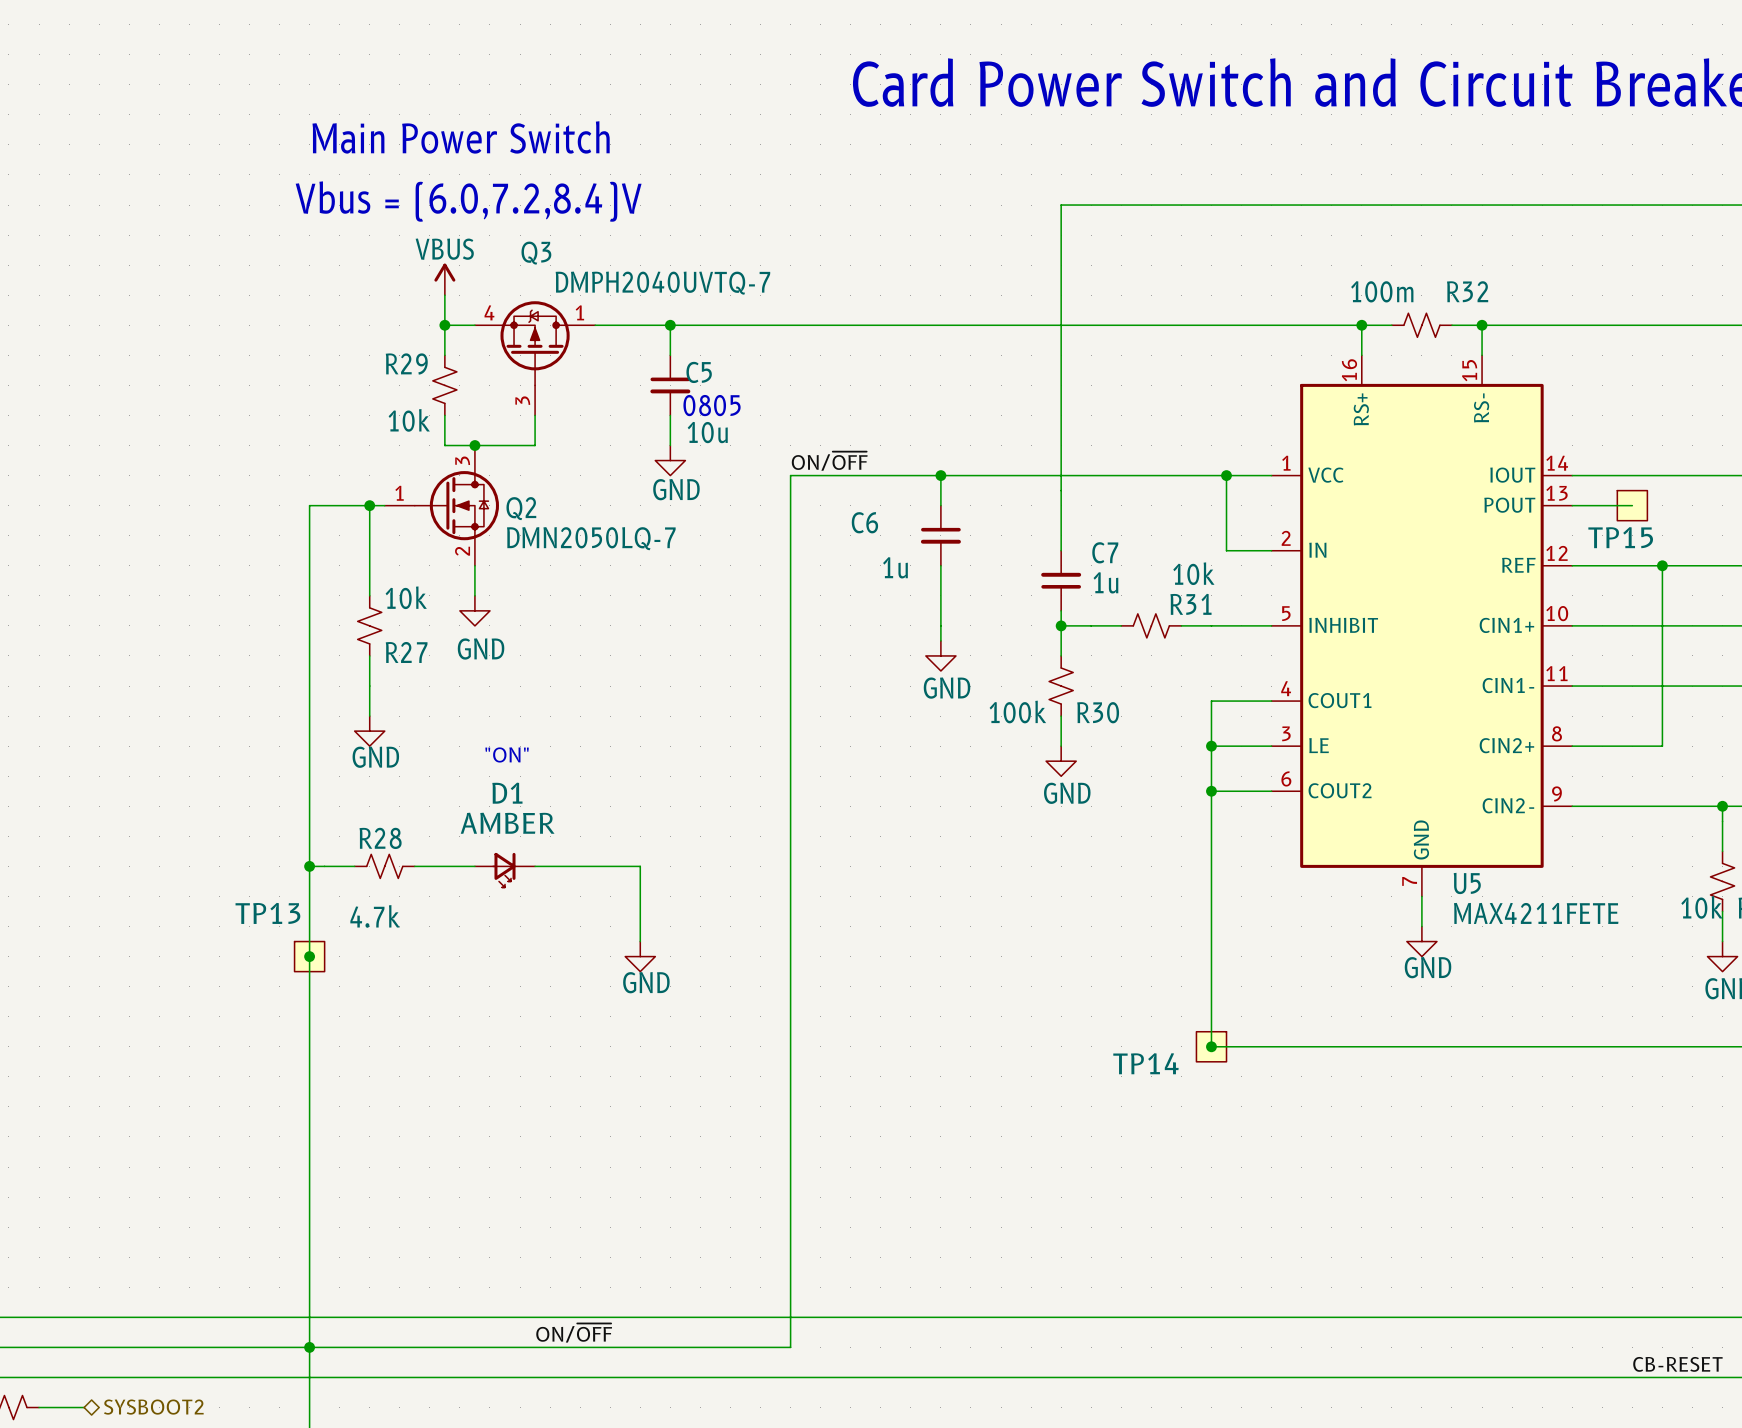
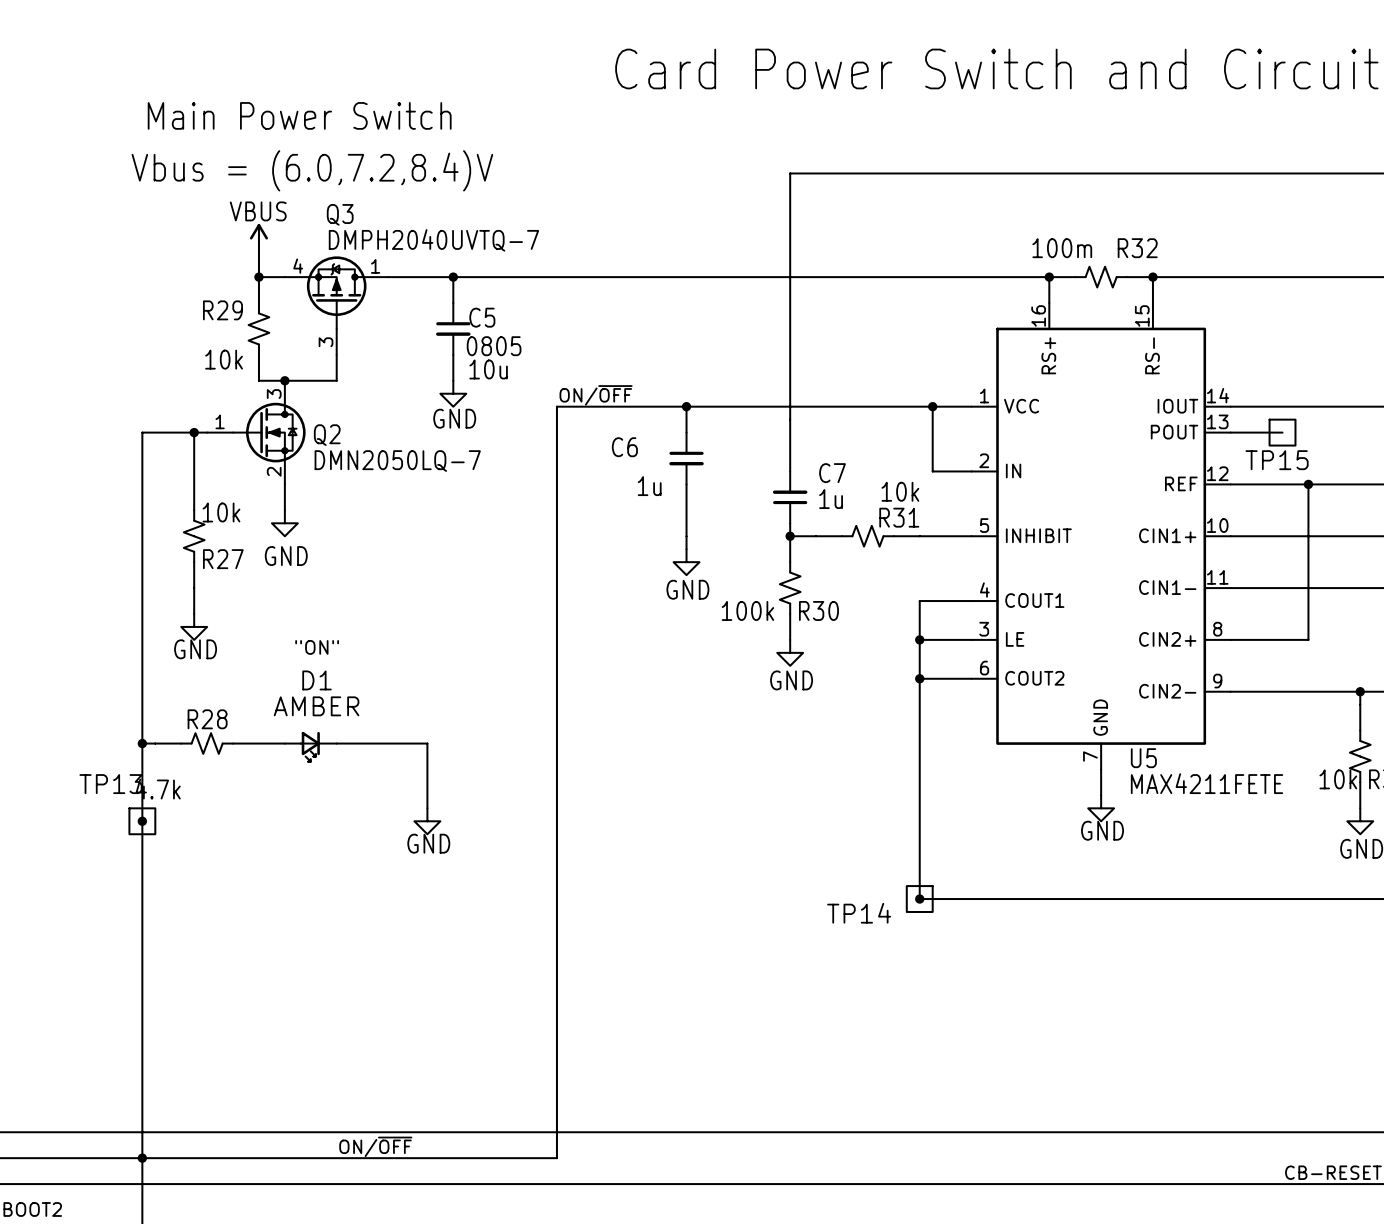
R28 value position: 4.7k (375, 916) -> 4.7k (158, 789)

